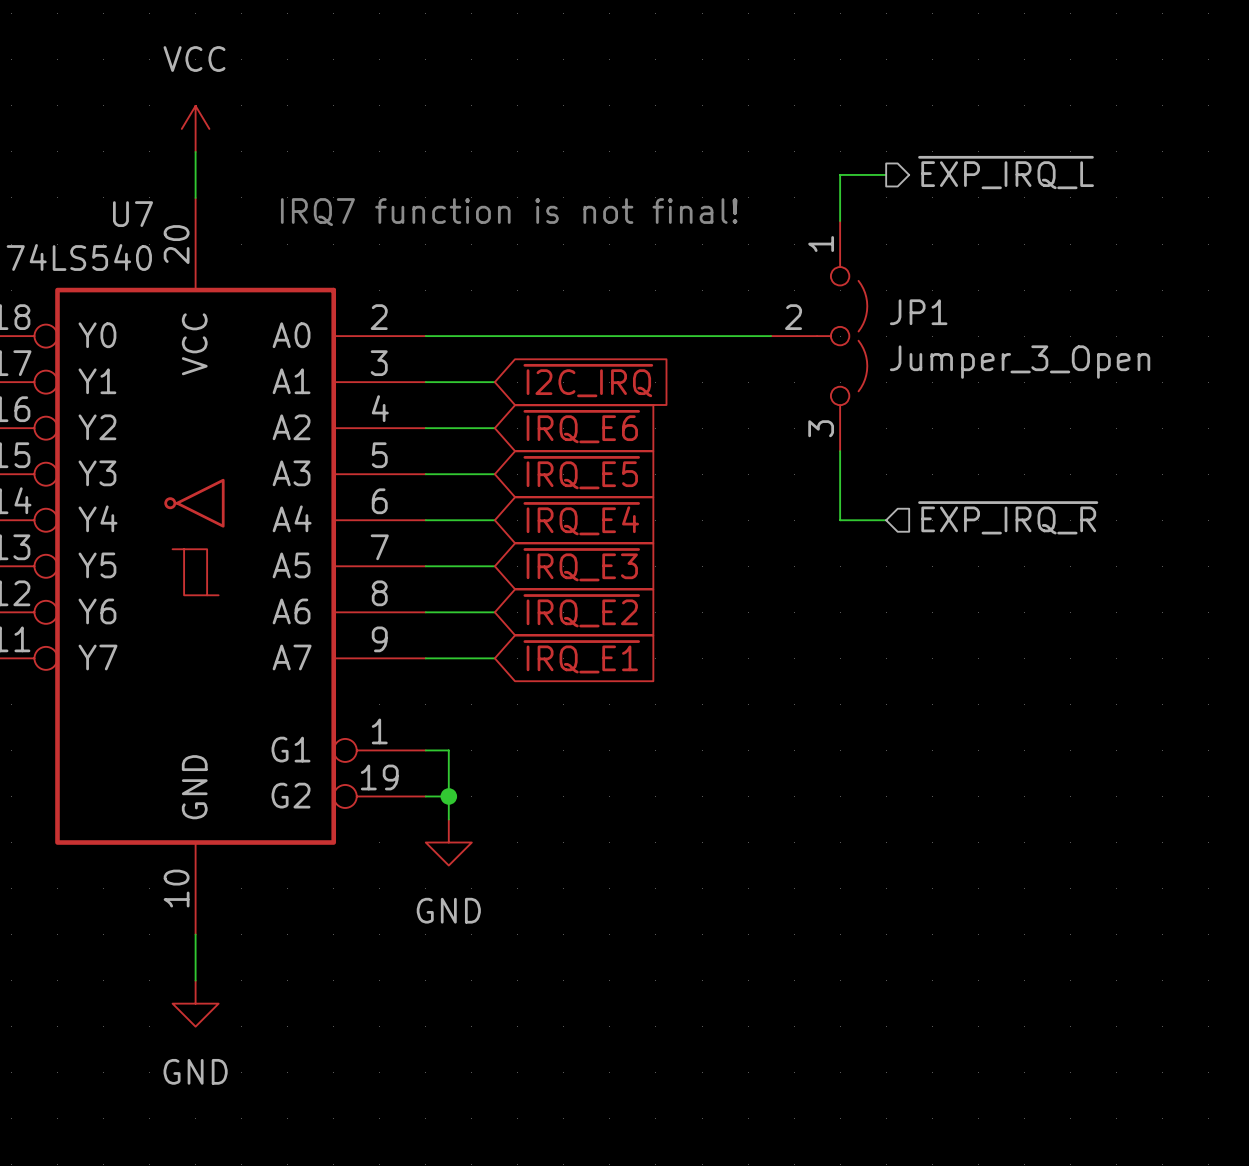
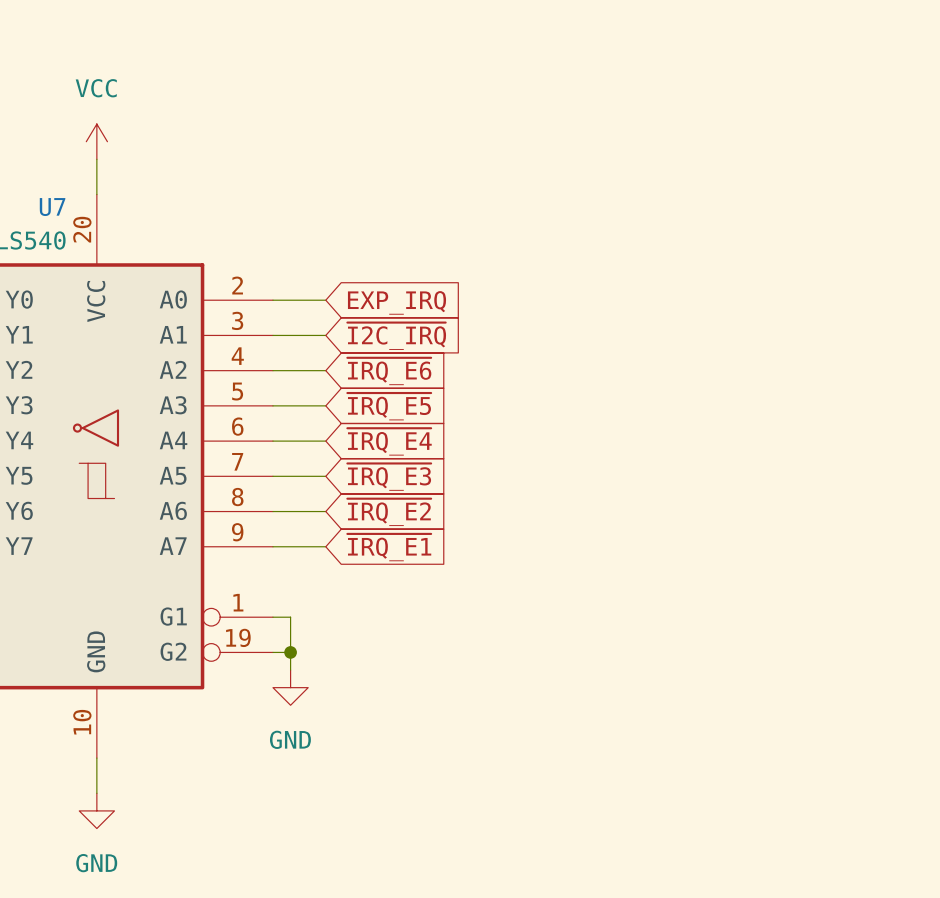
hierarchical label: ~{EXP_IRQ_L} (1006, 172) -> none
wire: (886, 174) (840, 174) (840, 221) -> none
text: IRQ7 function is not final! (509, 212) -> none
wire: (494, 336) (771, 336) -> none
JP1: Jumper_3_Open (819, 336) -> none
global label: none -> EXP_IRQ (396, 302)
wire: (840, 451) (840, 520) (886, 520) -> none
hierarchical label: ~{EXP_IRQ_R} (1008, 517) -> none

